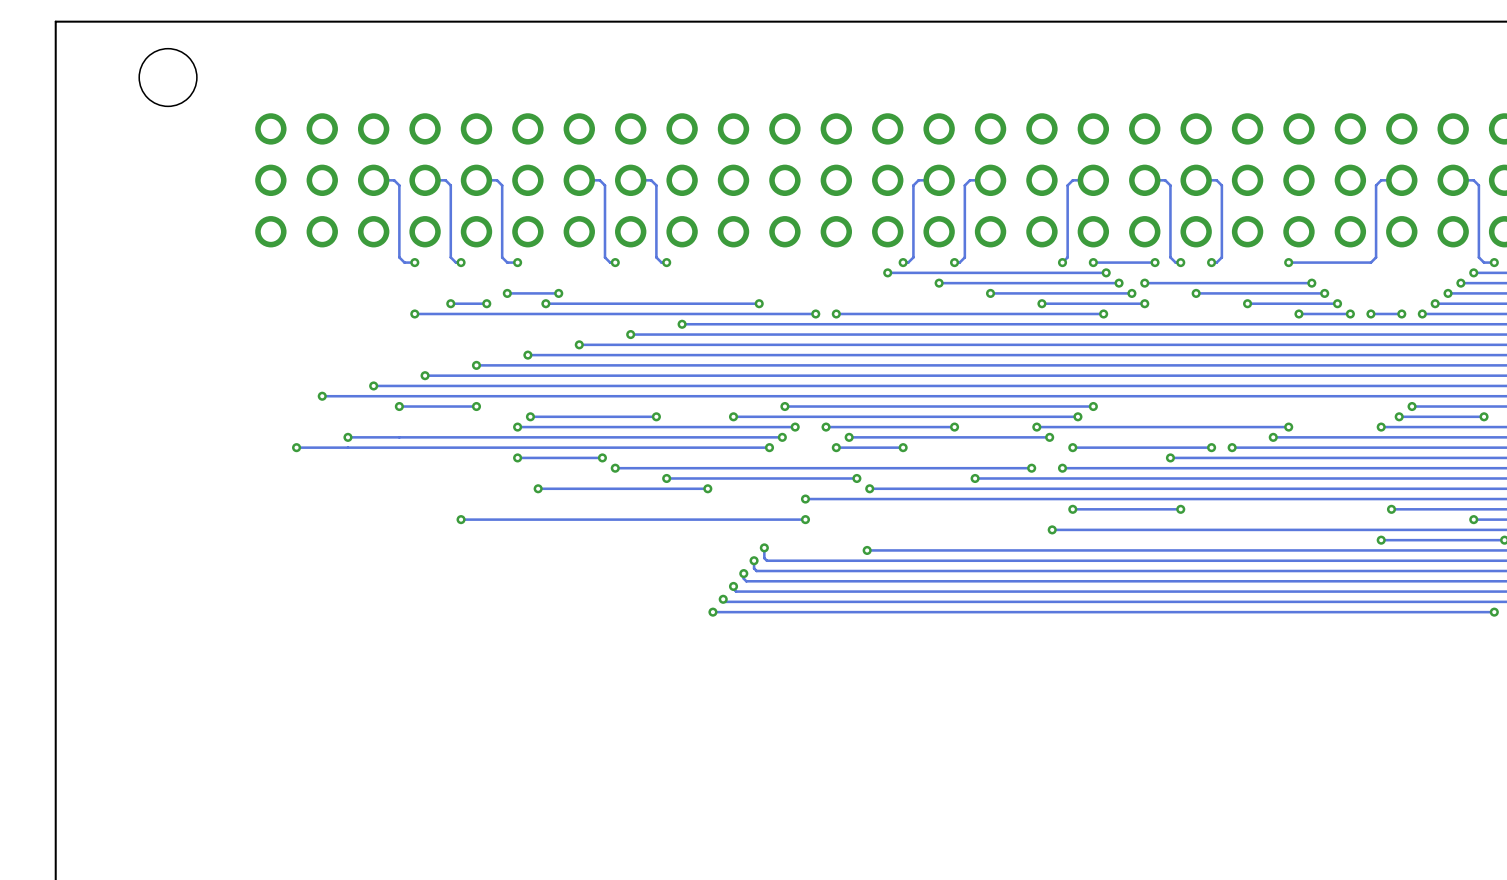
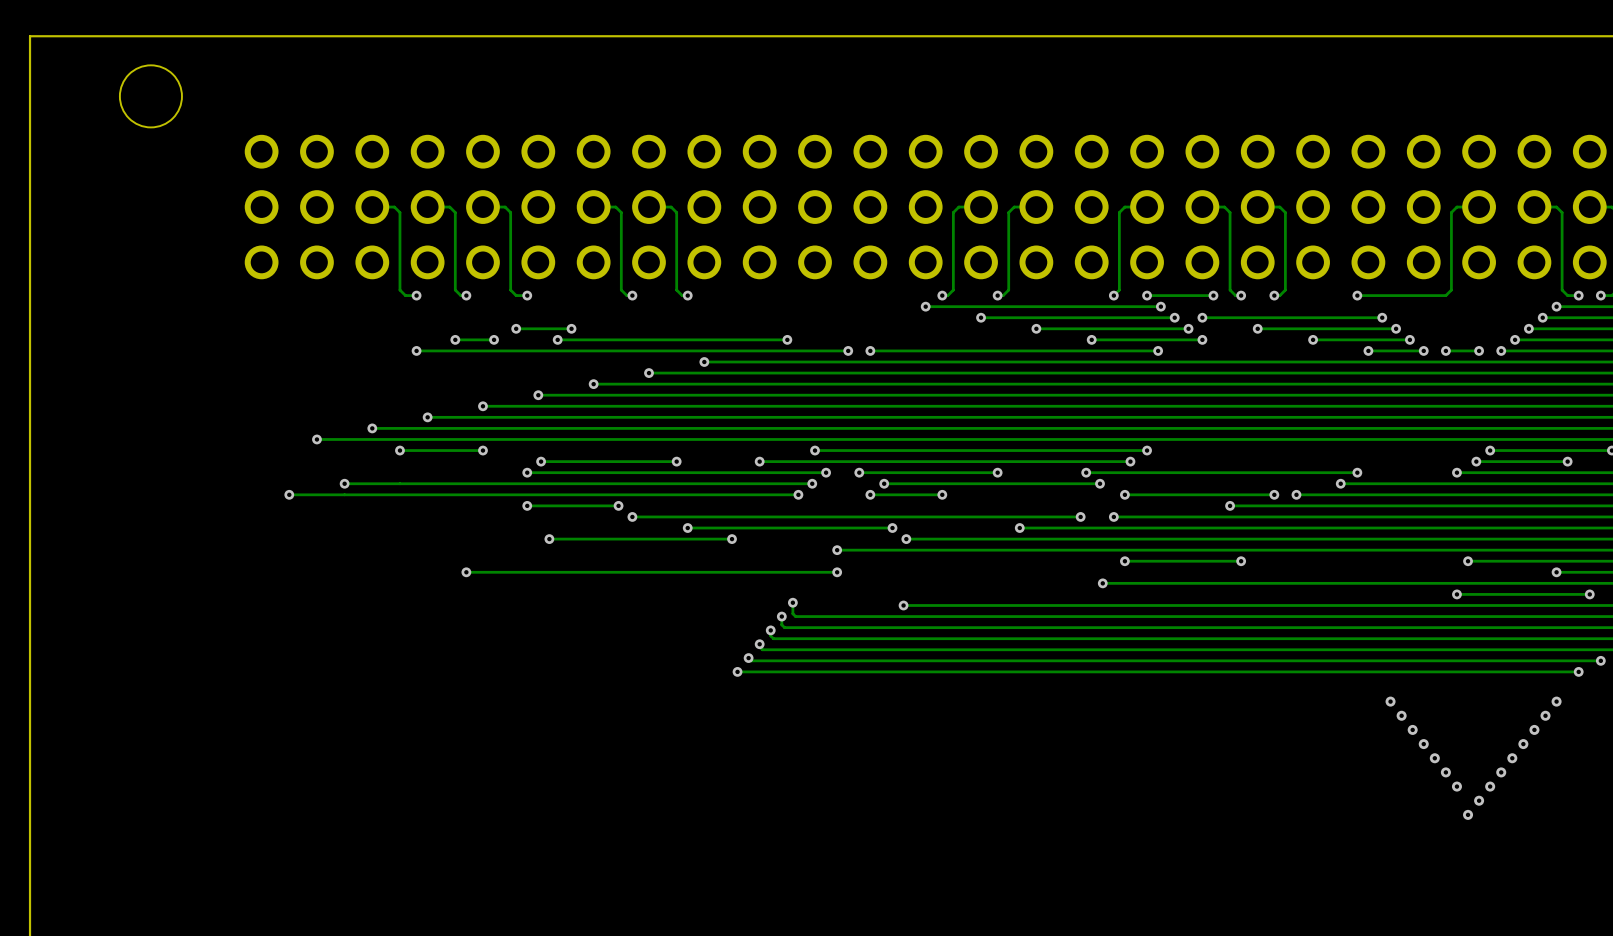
via: none -> (1390, 701)
via: none -> (1556, 701)
via: none -> (1401, 715)
via: none -> (1545, 715)
via: none -> (1412, 729)
via: none -> (1534, 729)
via: none -> (1423, 744)
via: none -> (1523, 744)
via: none -> (1434, 758)
via: none -> (1512, 758)
via: none -> (1445, 772)
via: none -> (1501, 772)
via: none -> (1456, 786)
via: none -> (1490, 786)
via: none -> (1479, 800)
via: none -> (1468, 814)

